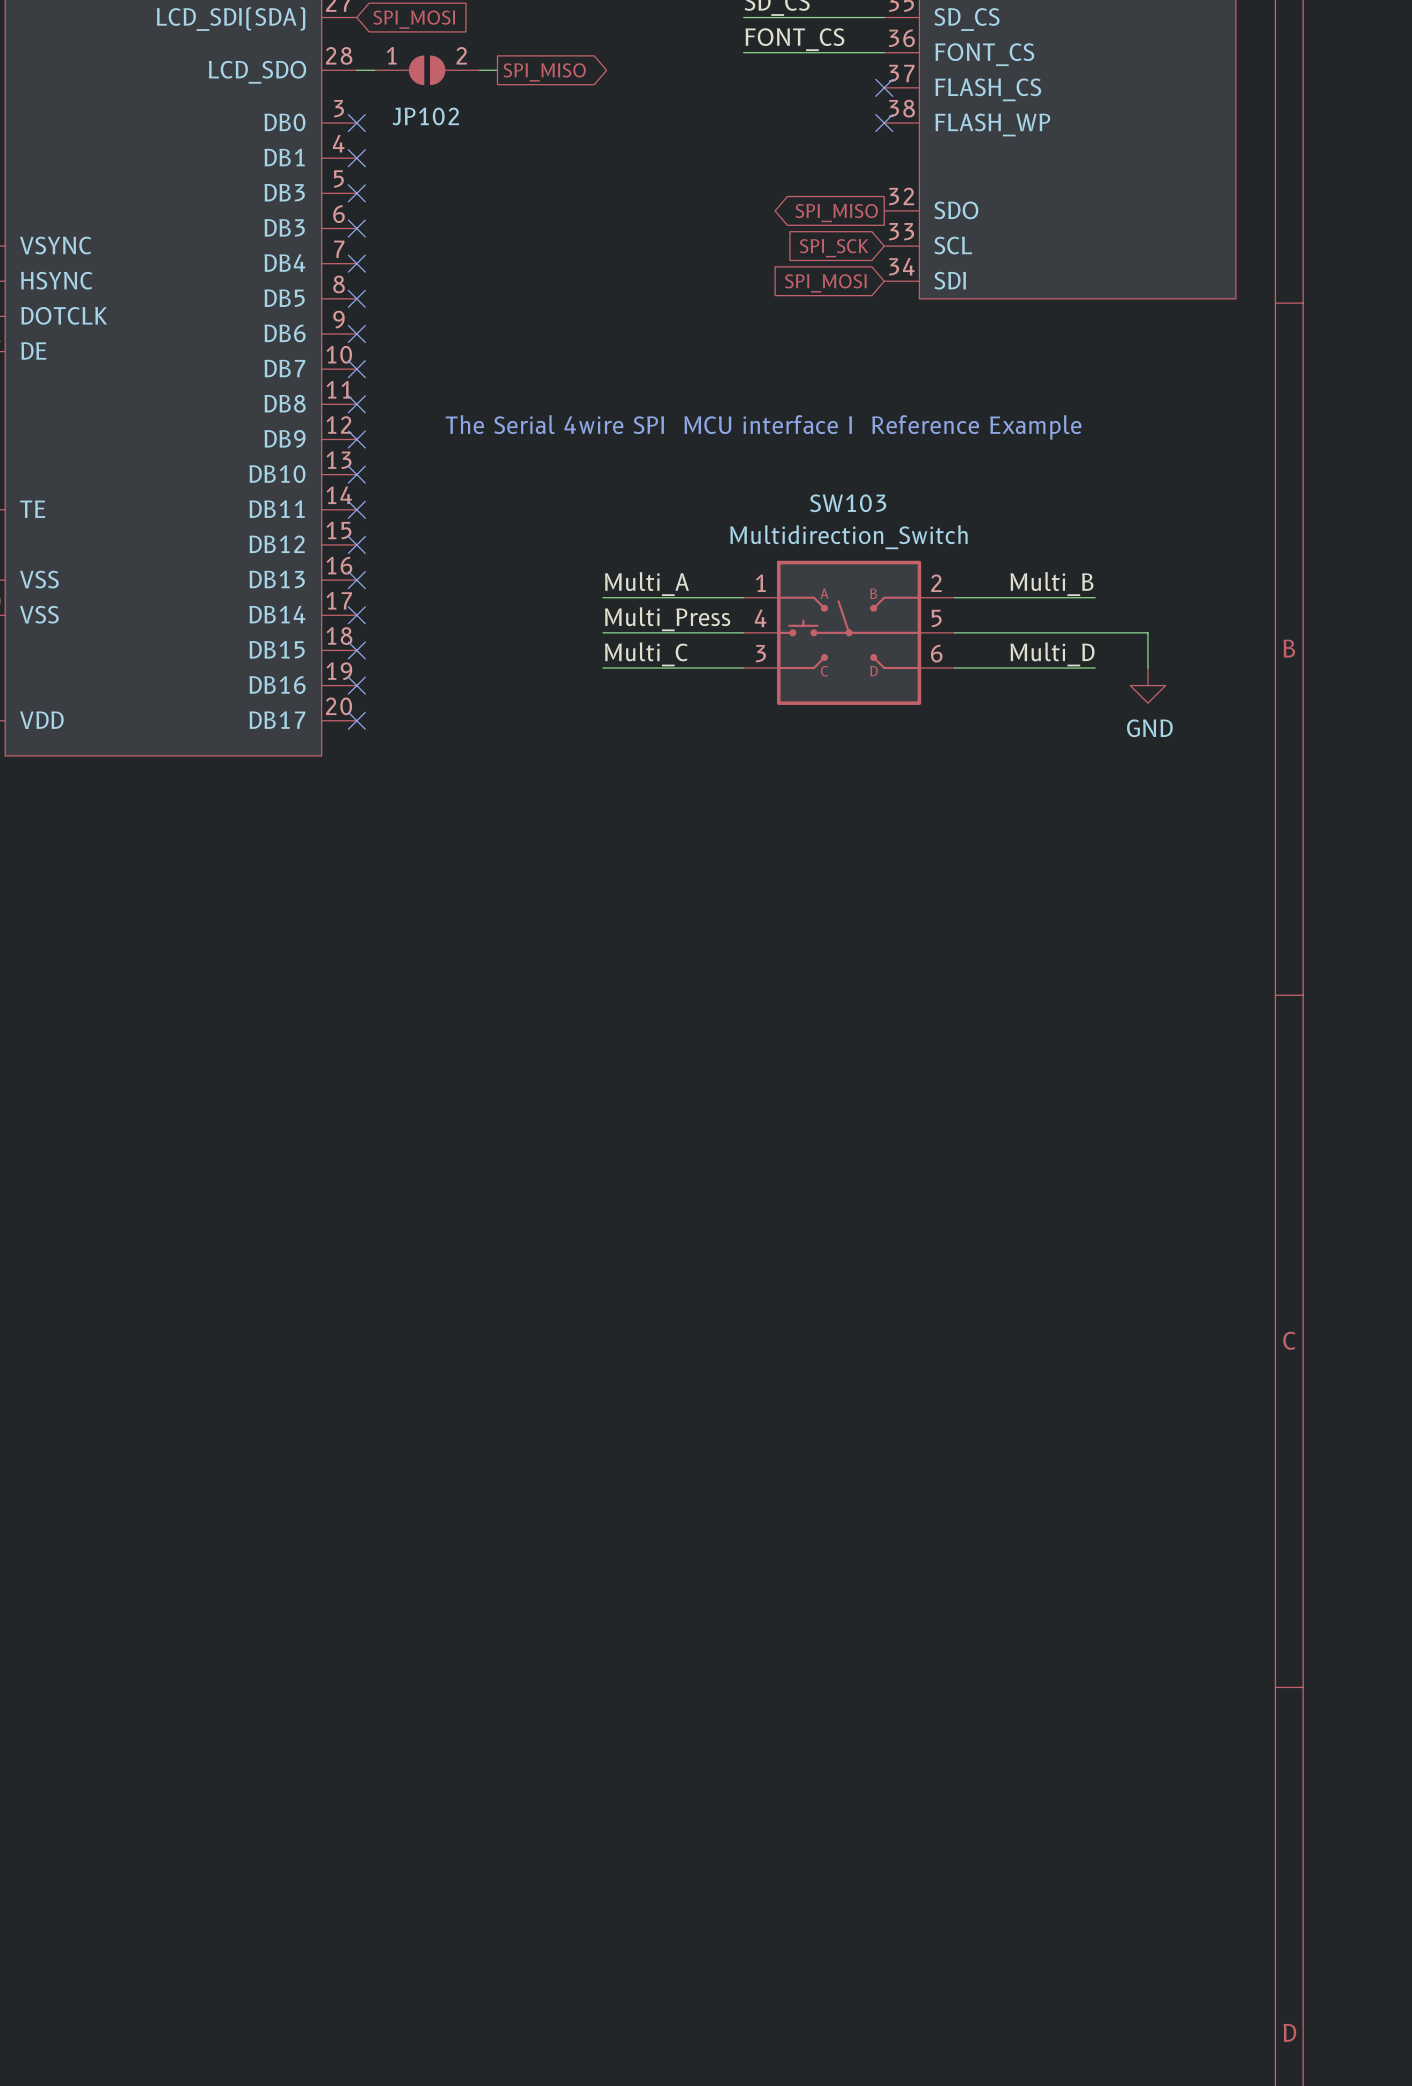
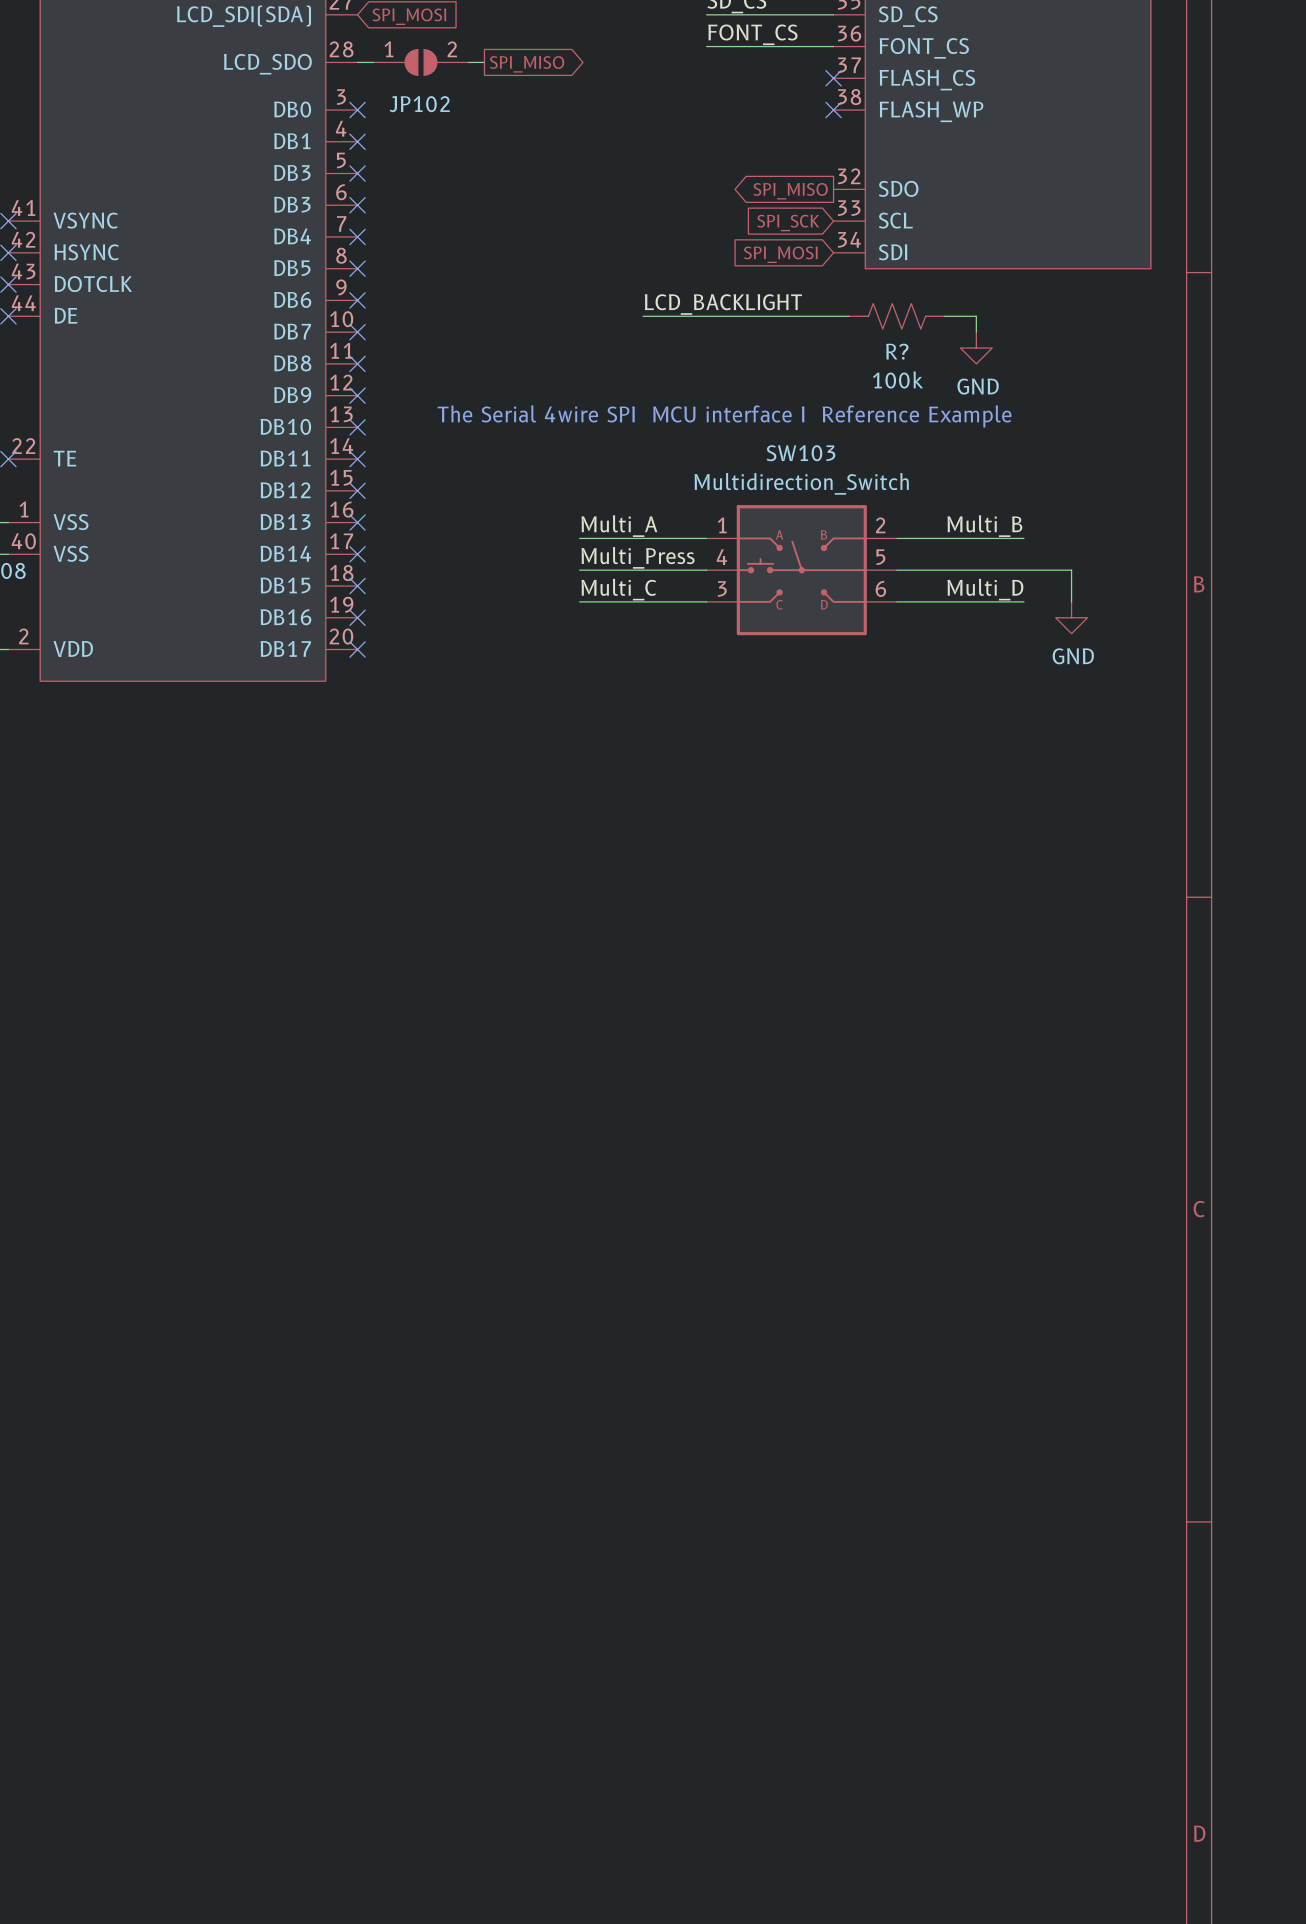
label: none -> LCD_BACKLIGHT (723, 304)
wire: none -> (643, 316) (849, 316)
R?: none -> 100k (897, 316)
wire: none -> (944, 316) (976, 316) (976, 332)
power symbol: none -> GND (976, 348)
text position: The Serial 4wire SPI MCU interface I Reference Example (763, 427) -> The Serial 4wire SPI MCU interface I Reference Example (724, 416)

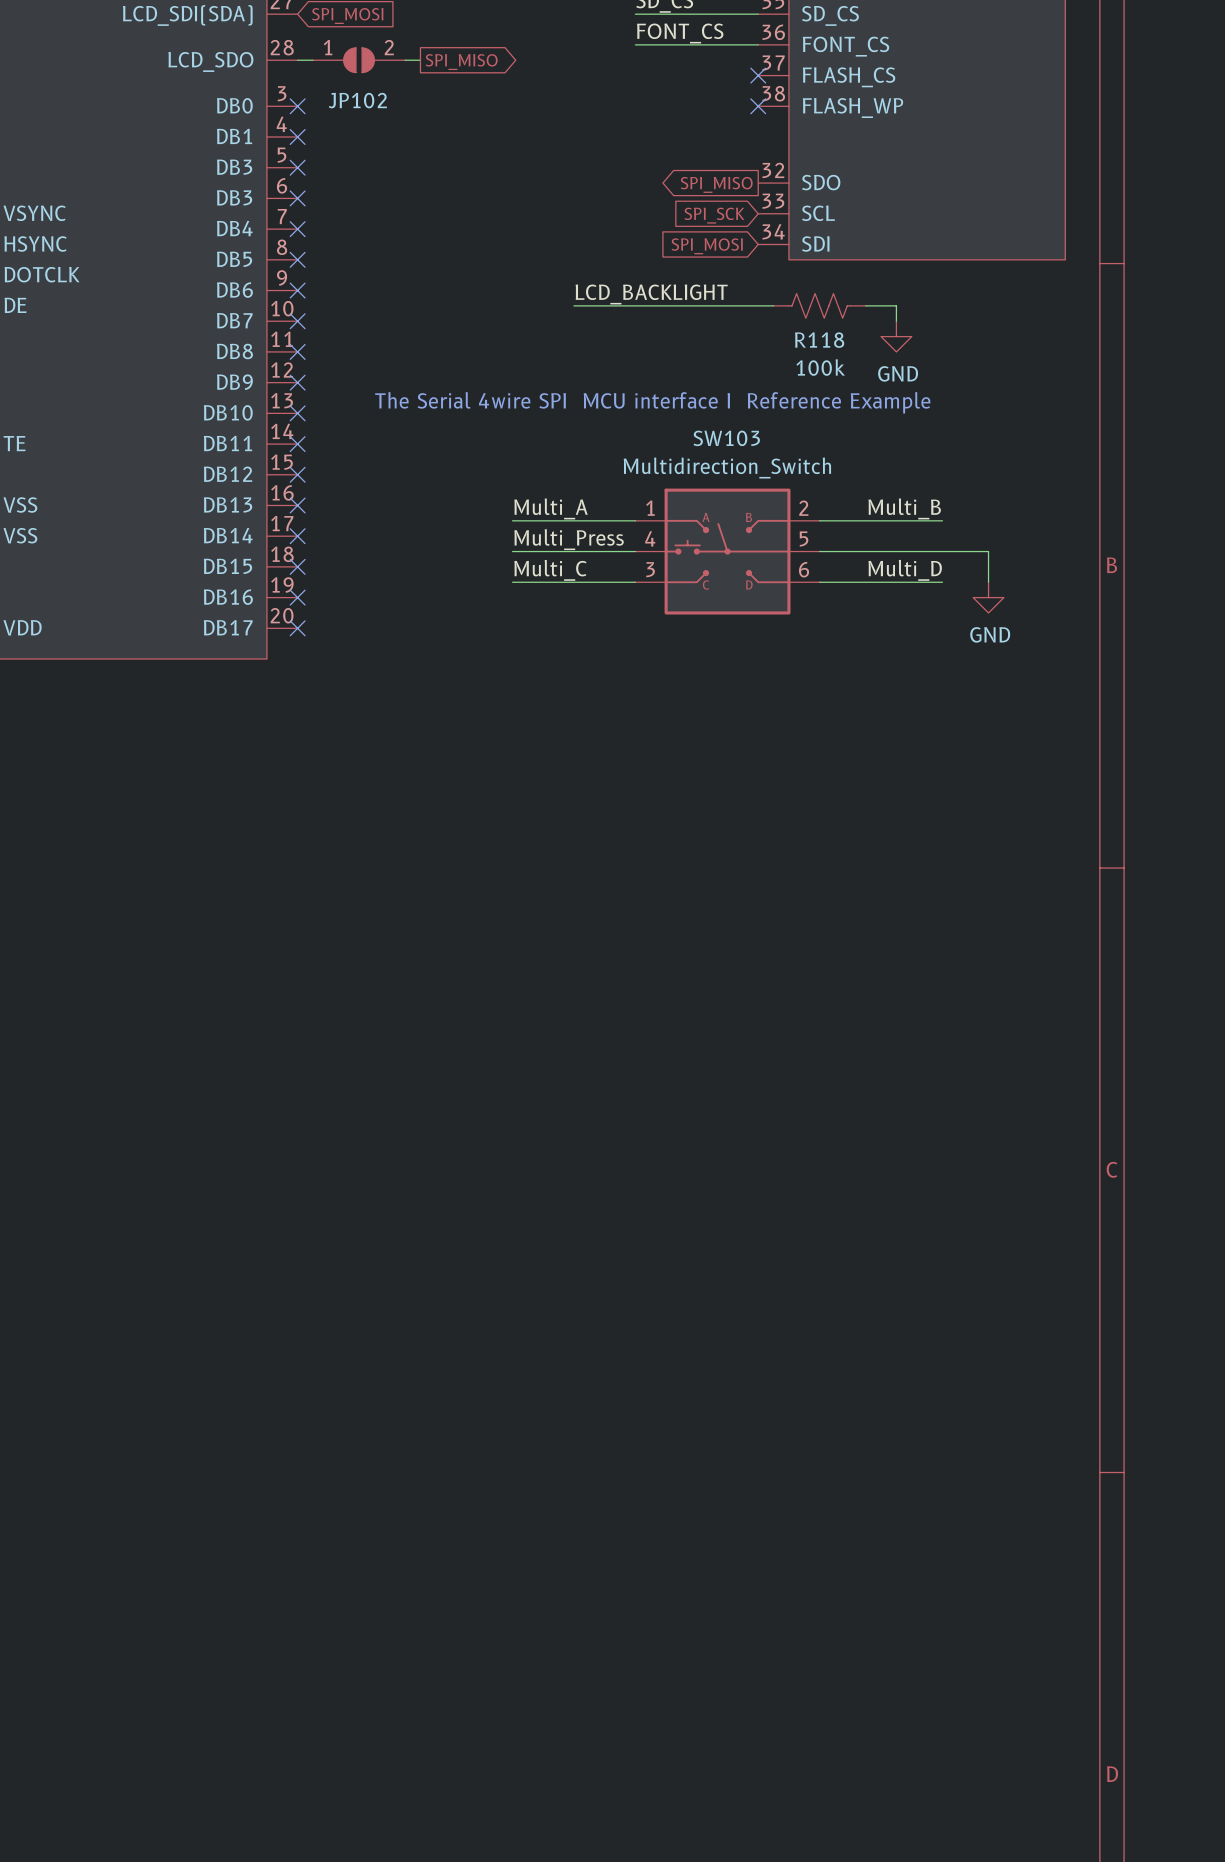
R? name: R? (897, 351) -> R118 (819, 340)

